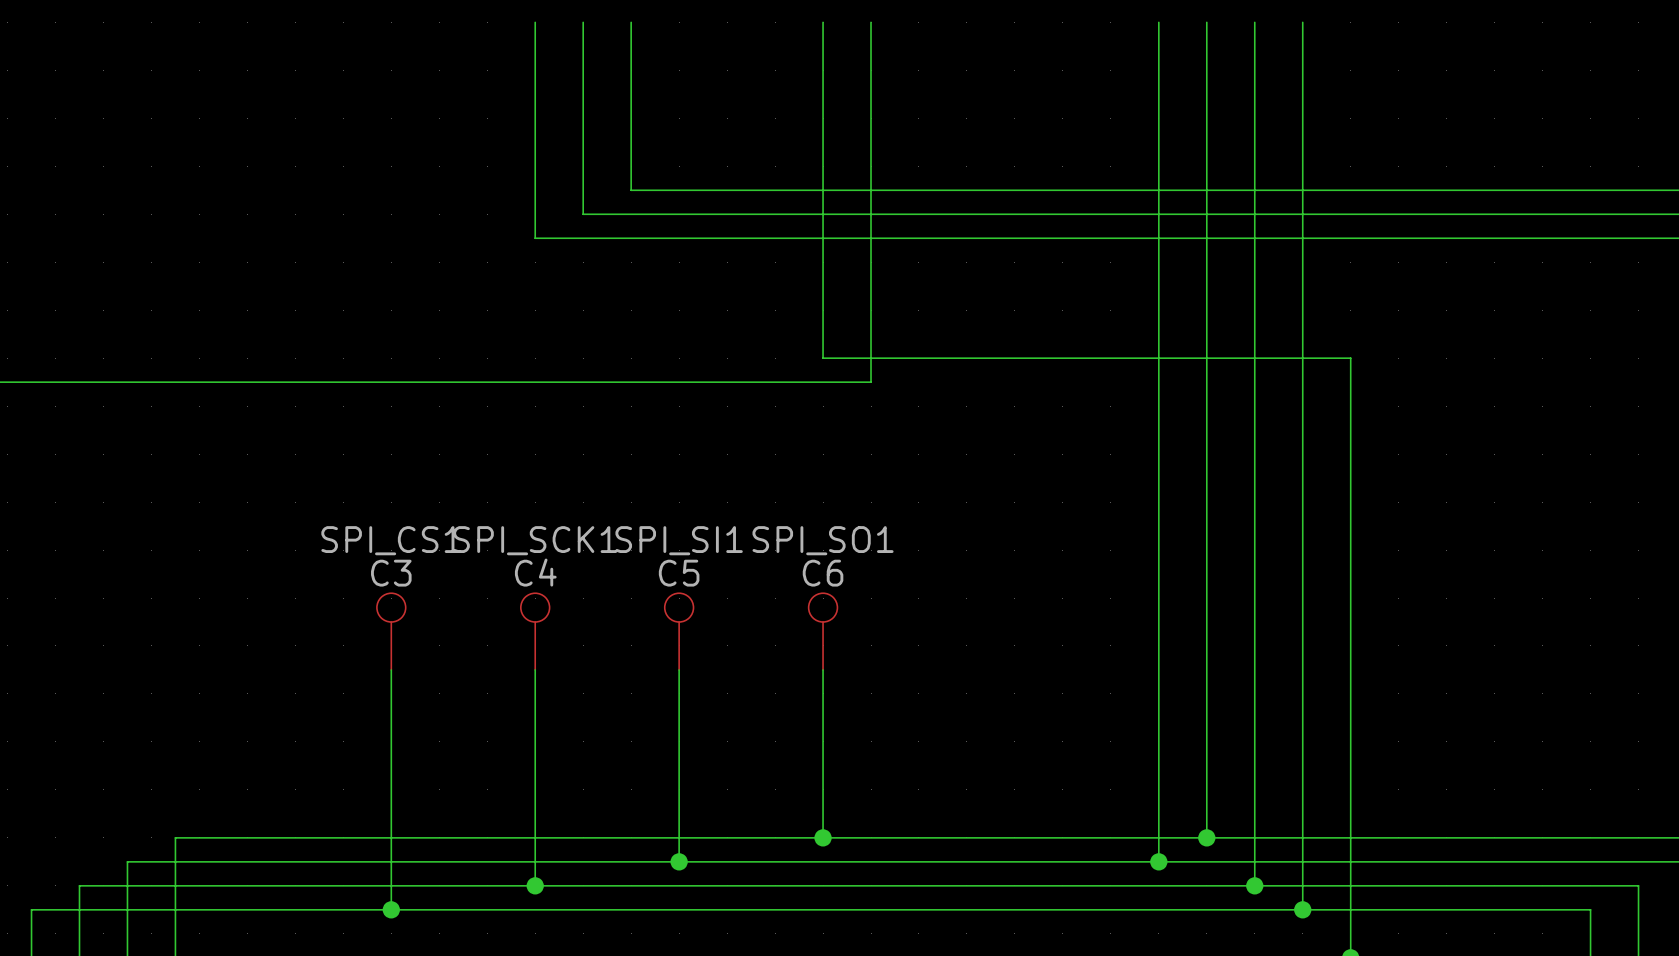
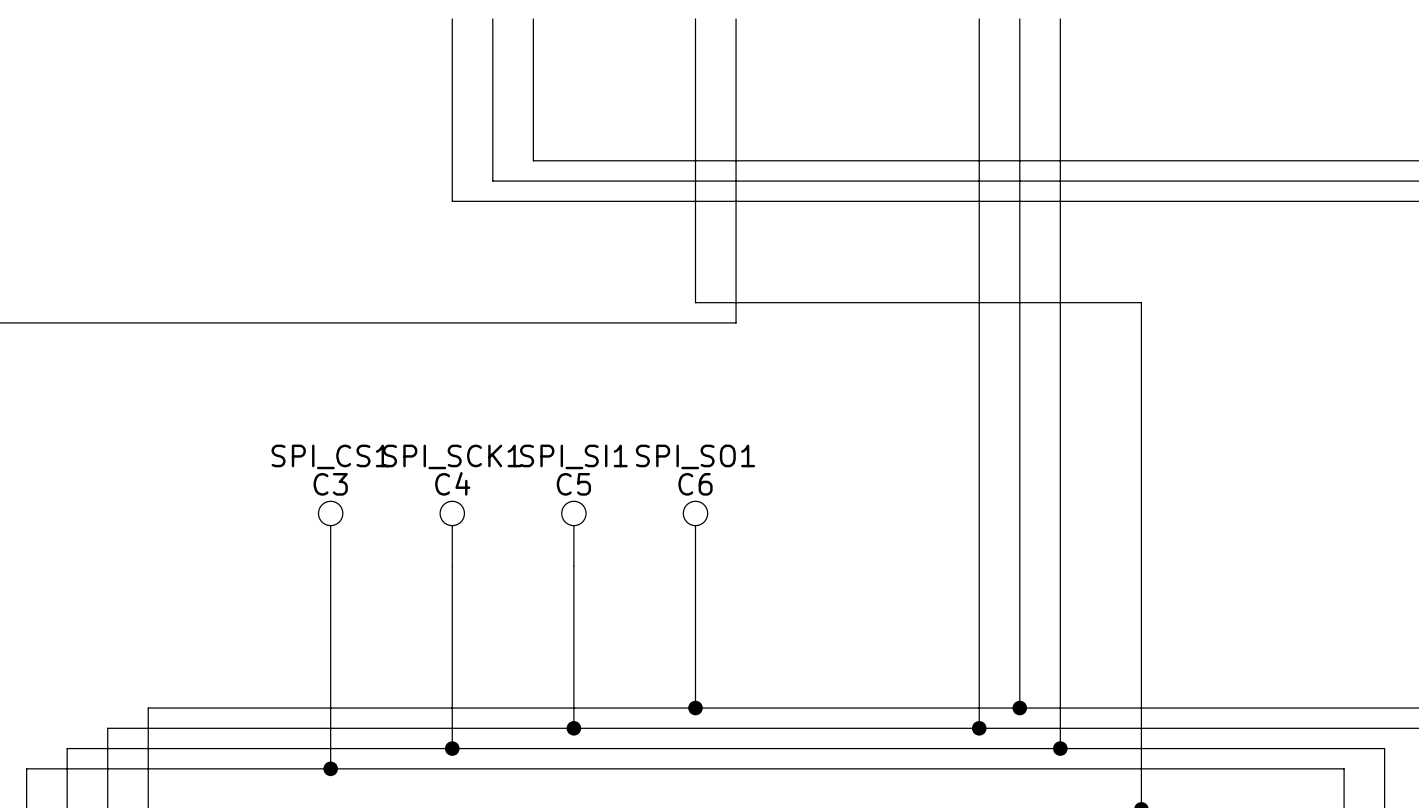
wire: (1302, 22) (1302, 909) -> none
junction: (1302, 909) -> none

